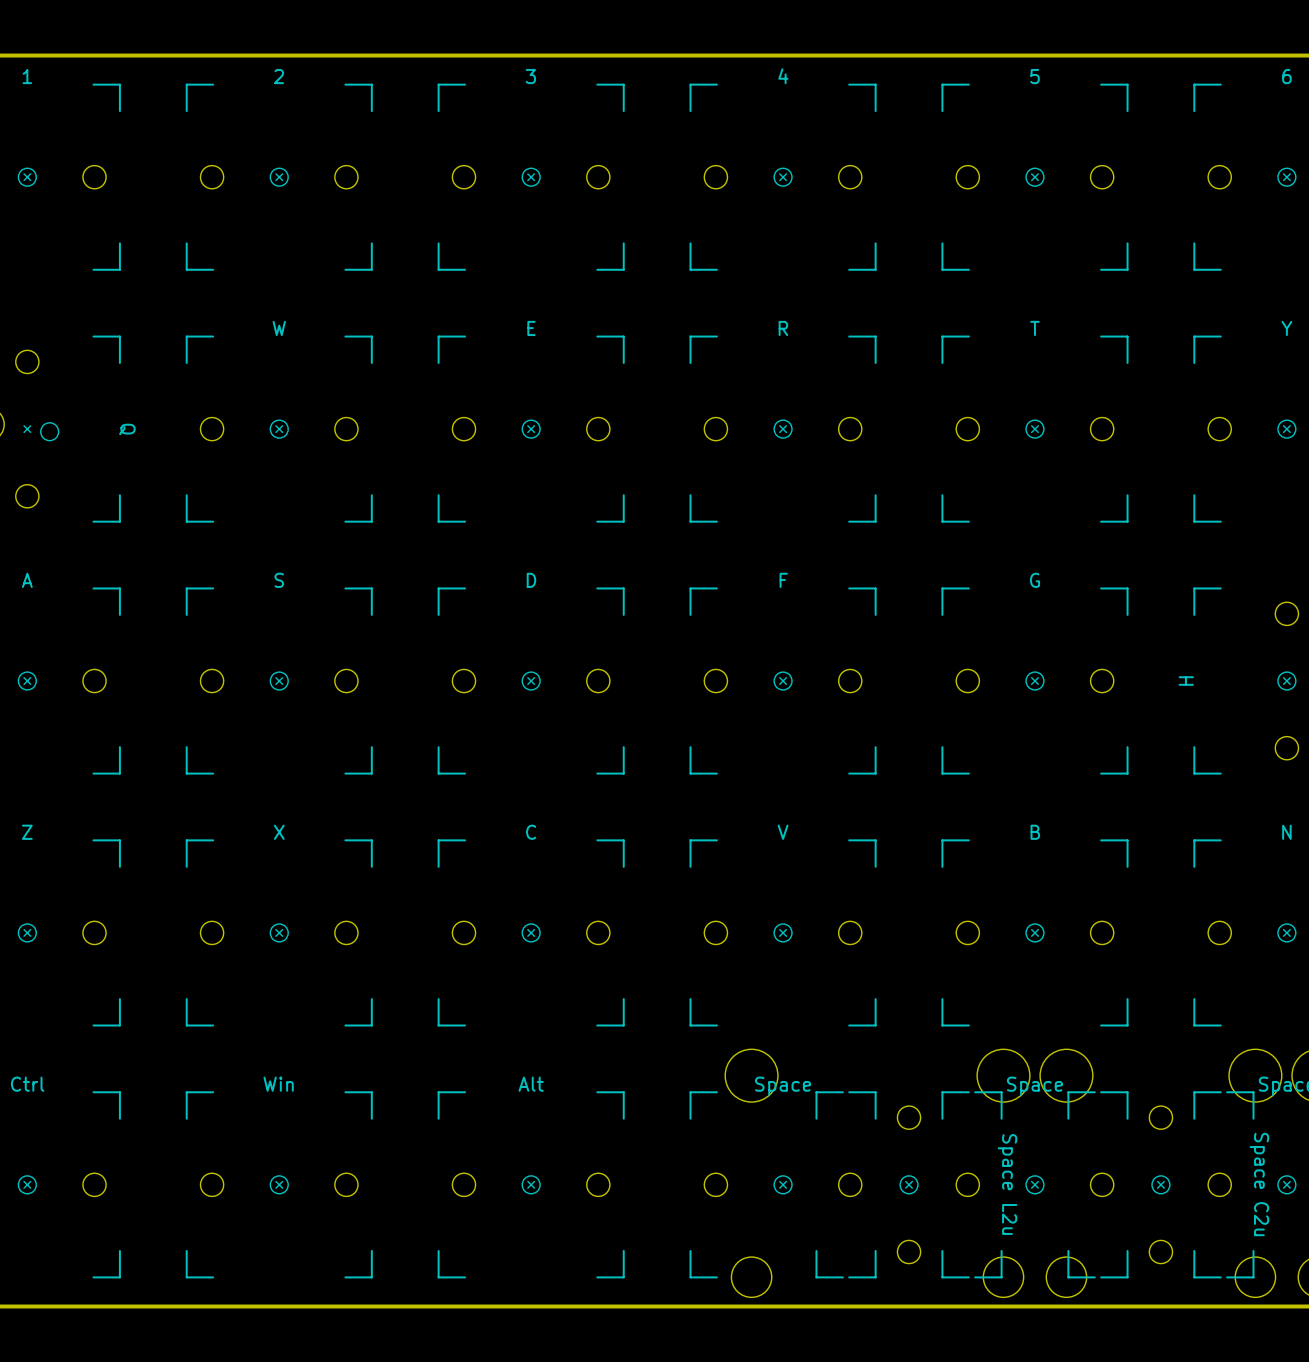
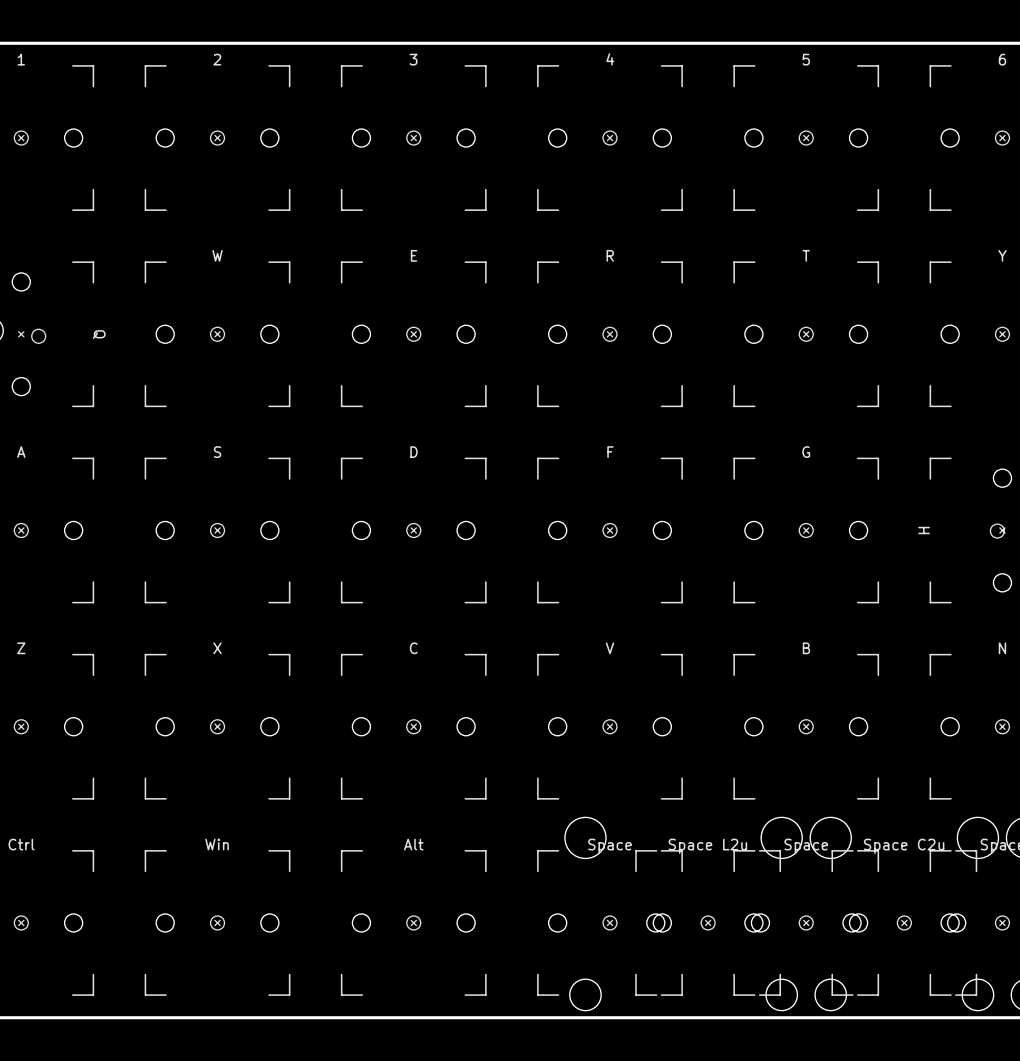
part footprint: [1277, 671, 1297, 691] -> [989, 523, 1005, 539]
part rotation: 0° (909, 1184) -> 90° clockwise (708, 922)
part value position: Space L2u (1007, 1184) -> Space L2u (707, 846)
part rotation: 0° (1160, 1184) -> 90° clockwise (904, 922)
part value position: Space C2u (1259, 1184) -> Space C2u (904, 846)

